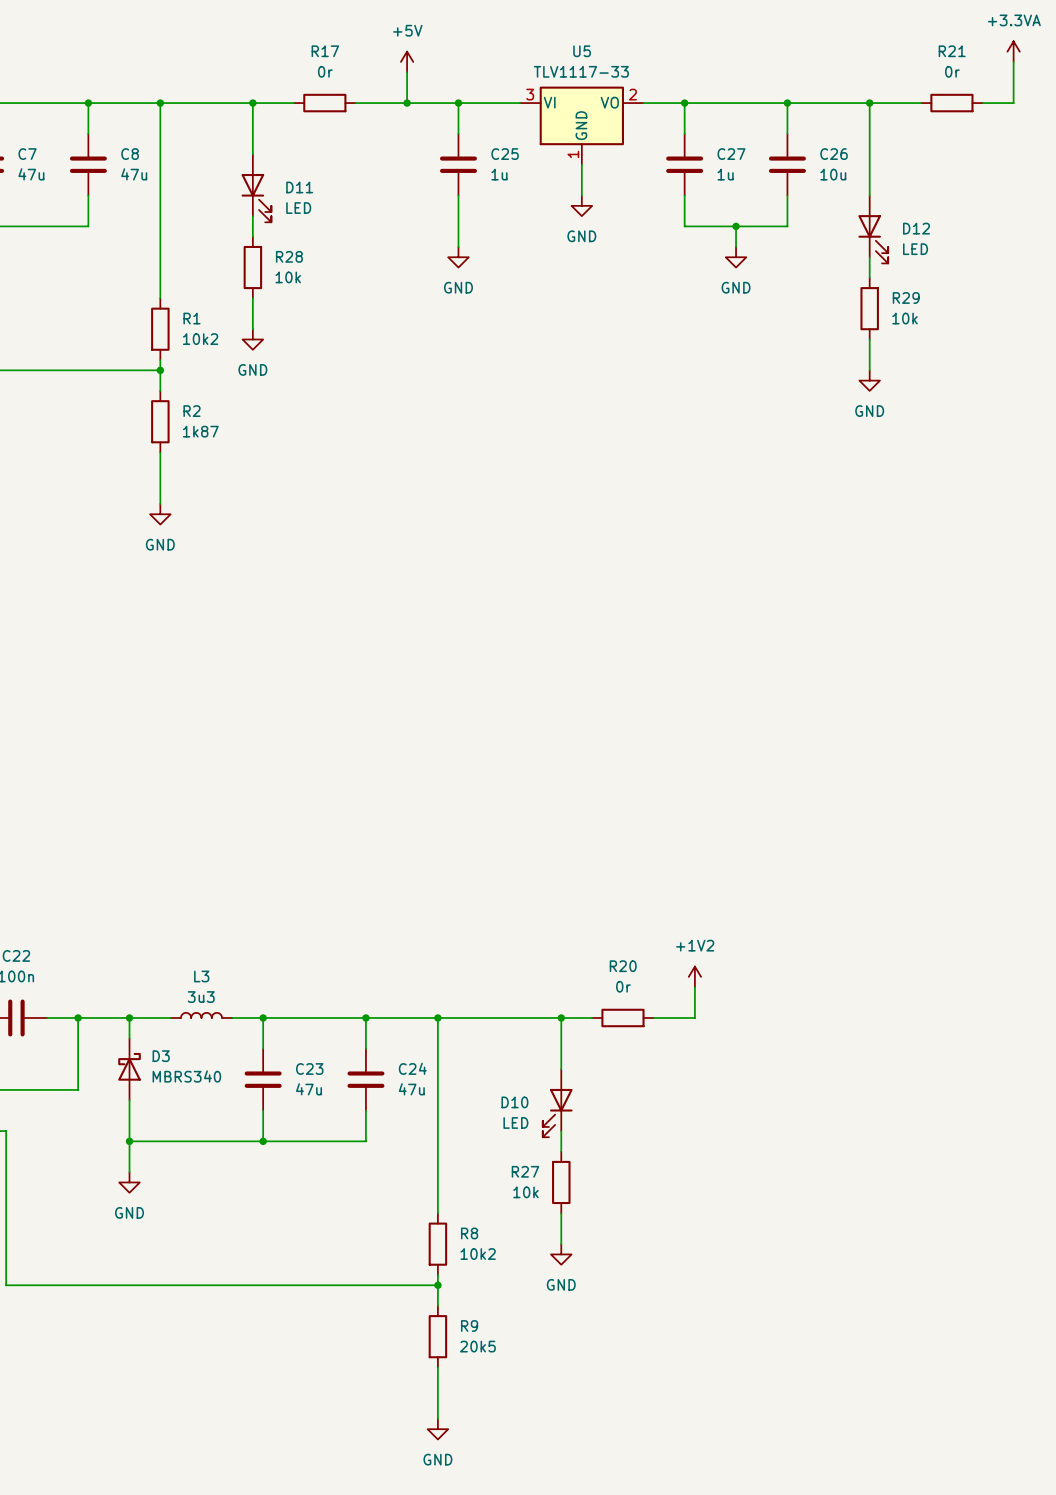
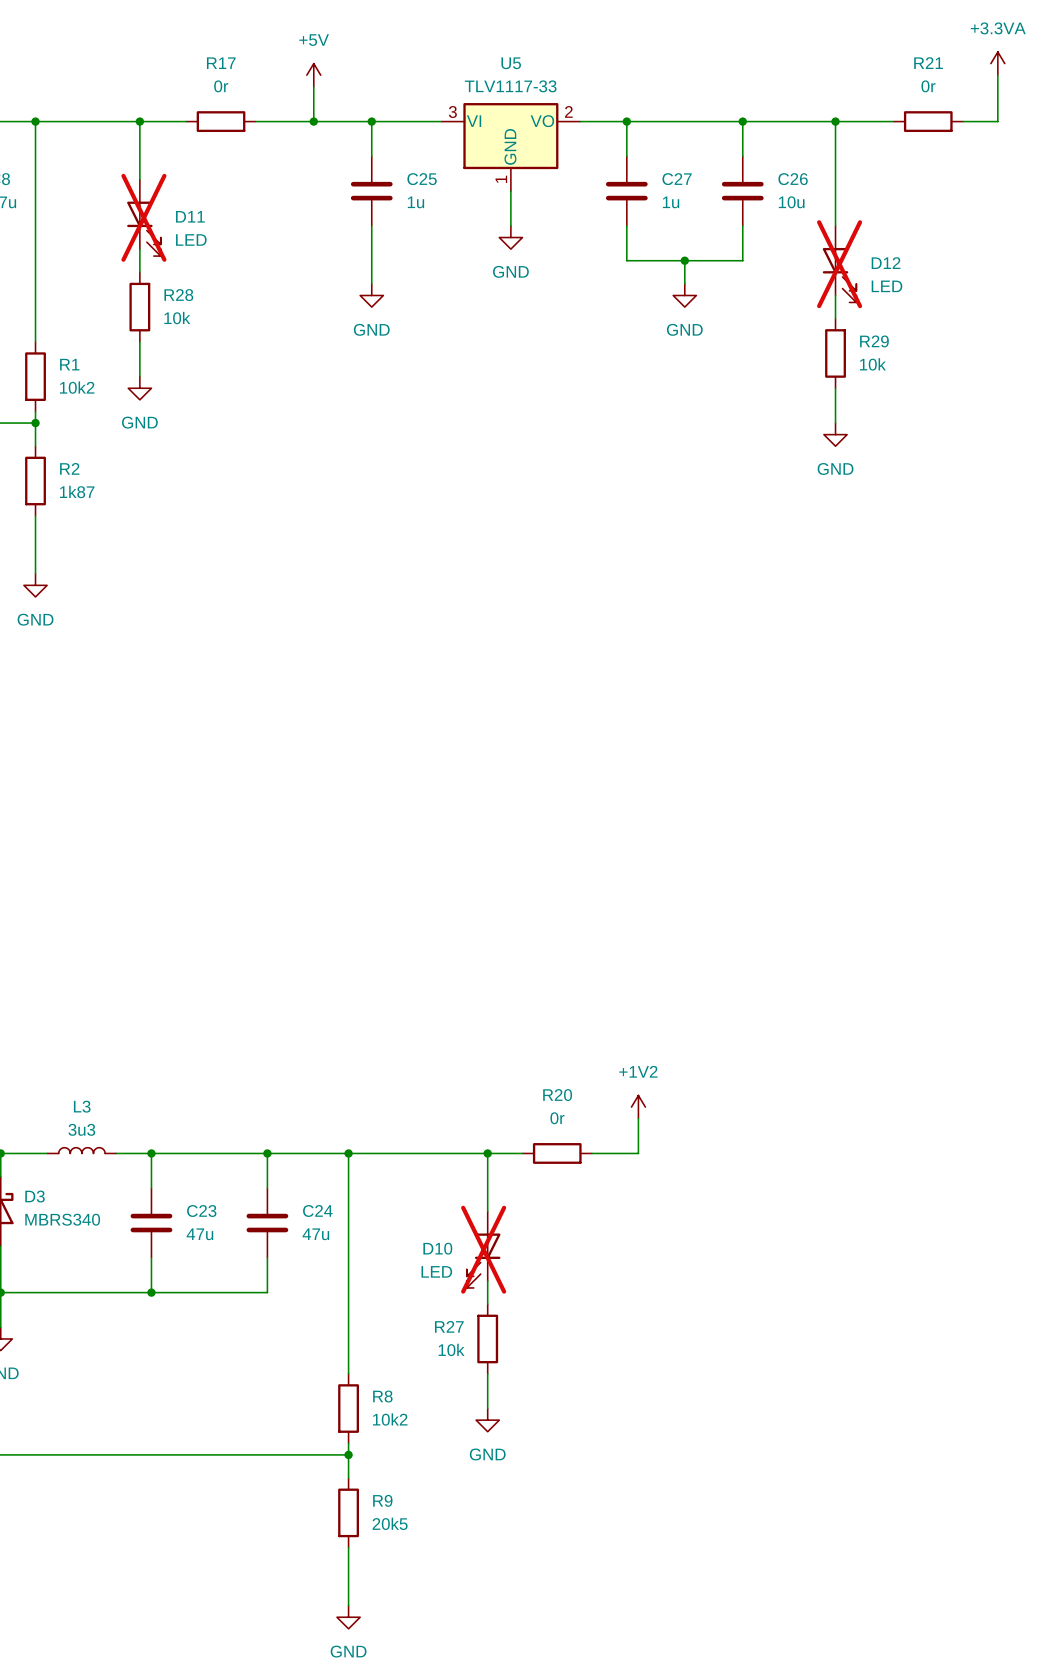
D11 do-not-place cross: none -> (143, 217)
D12 do-not-place cross: none -> (839, 264)
D10 do-not-place cross: none -> (483, 1249)

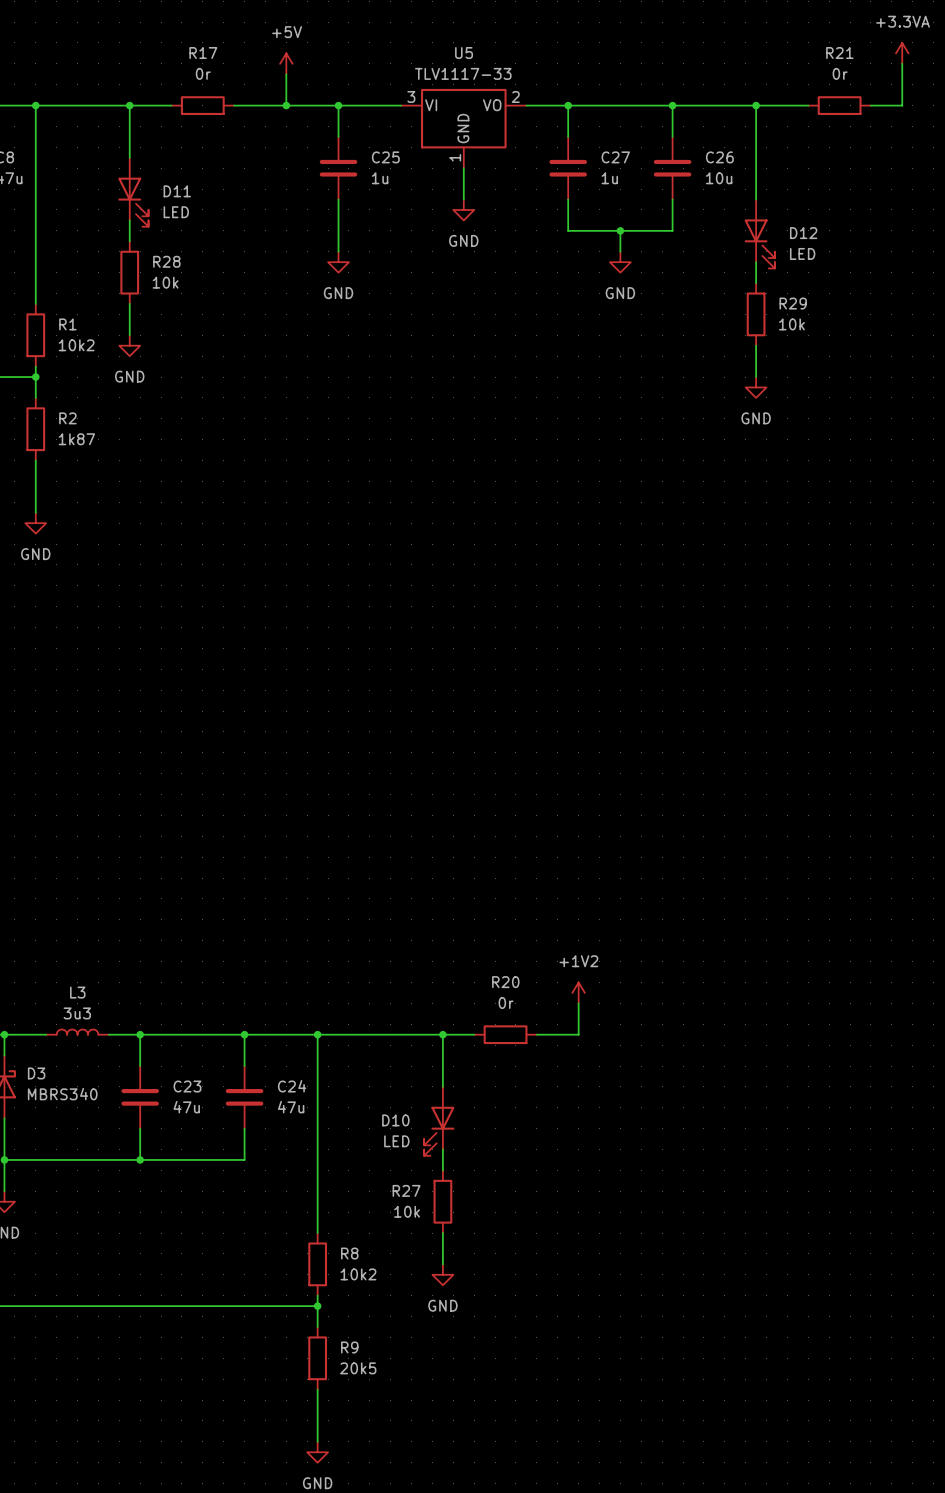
D11 do-not-place cross: (143, 217) -> none
D12 do-not-place cross: (839, 264) -> none
D10 do-not-place cross: (483, 1249) -> none

